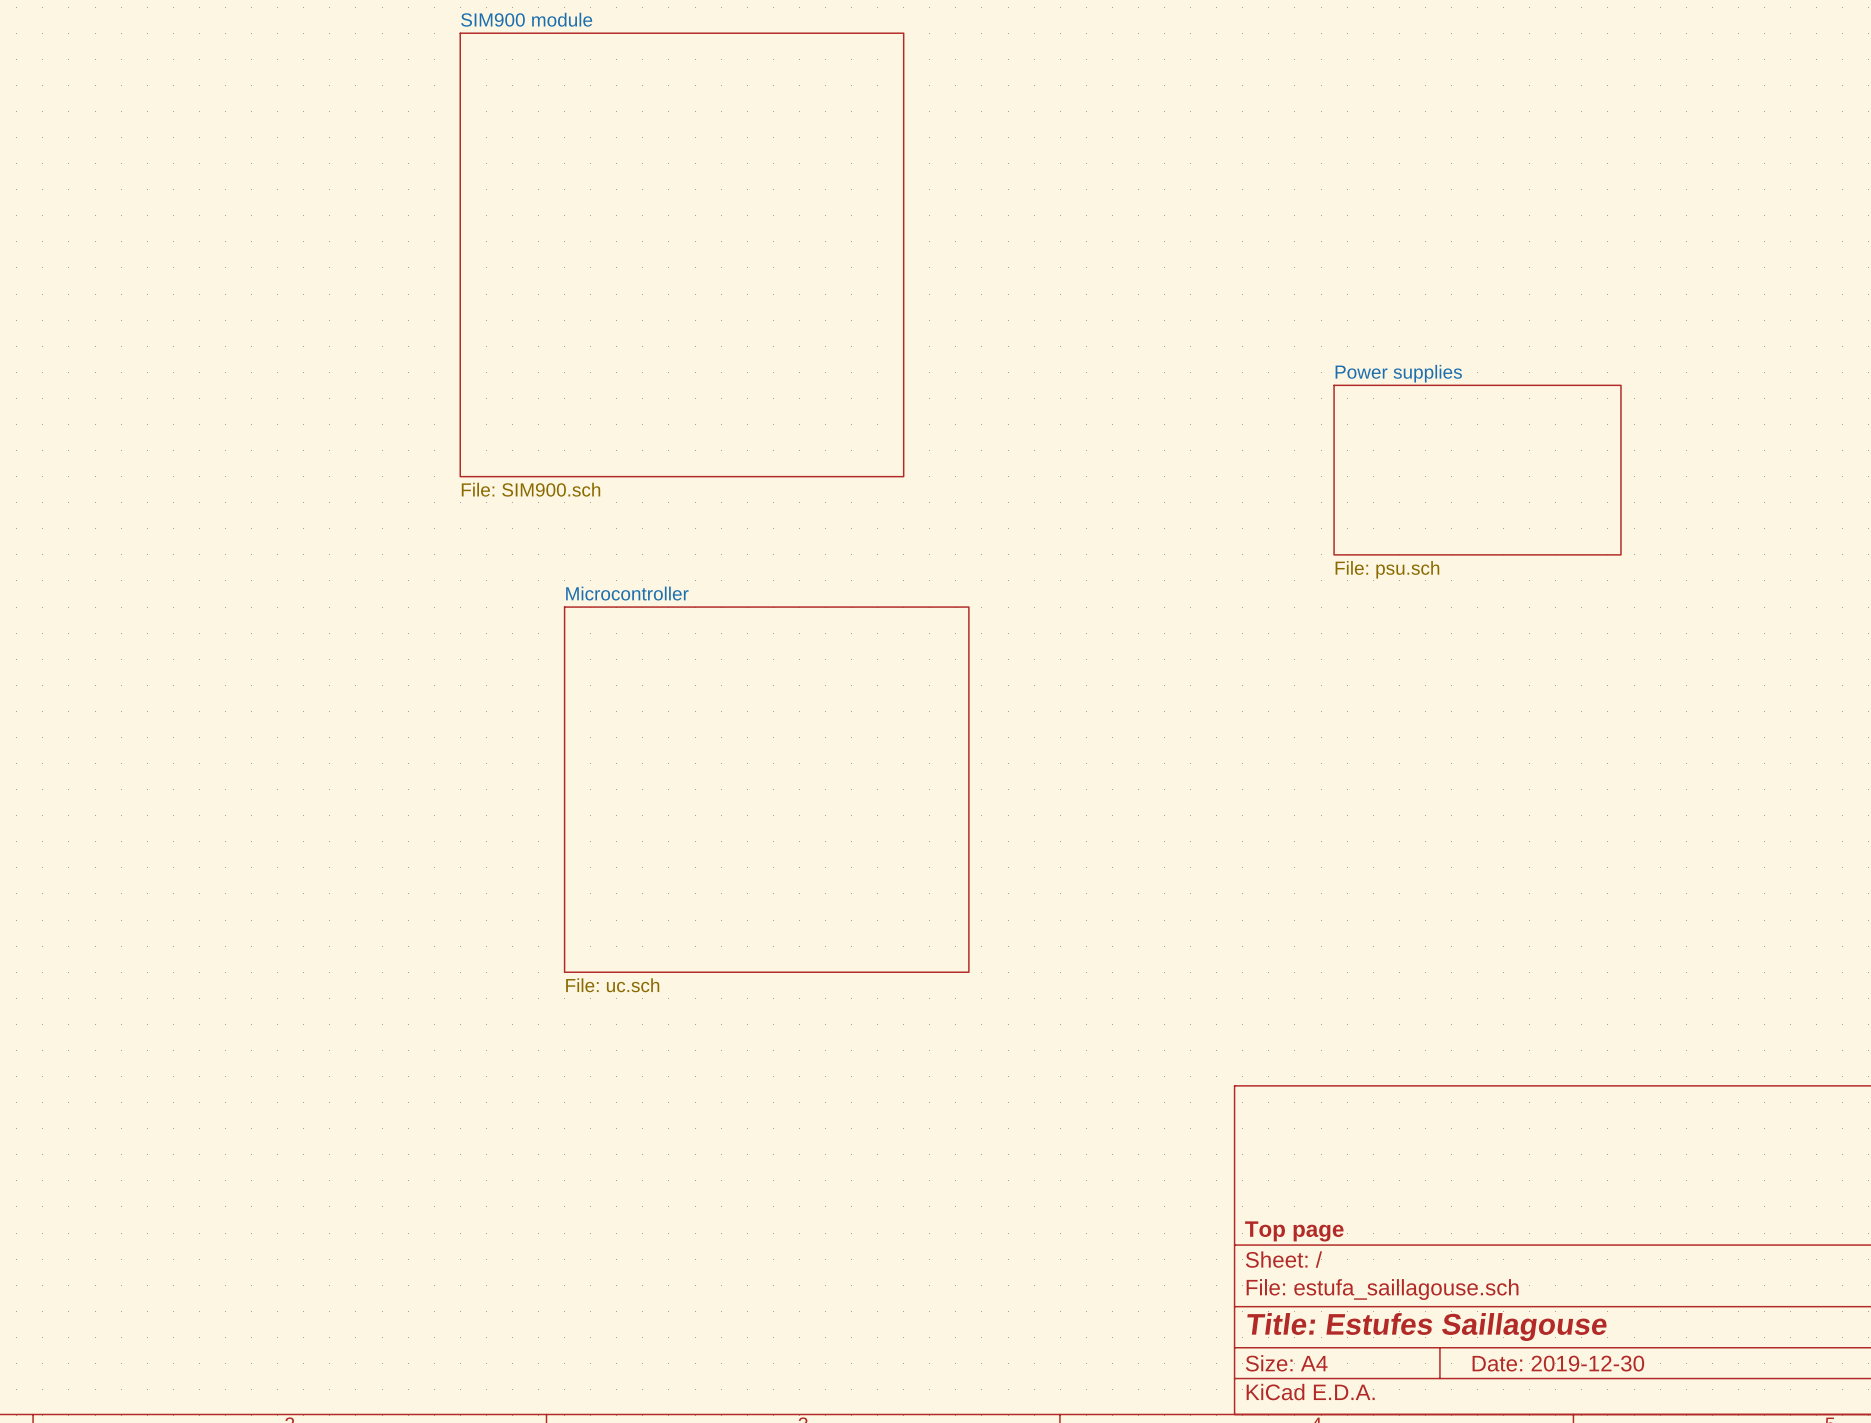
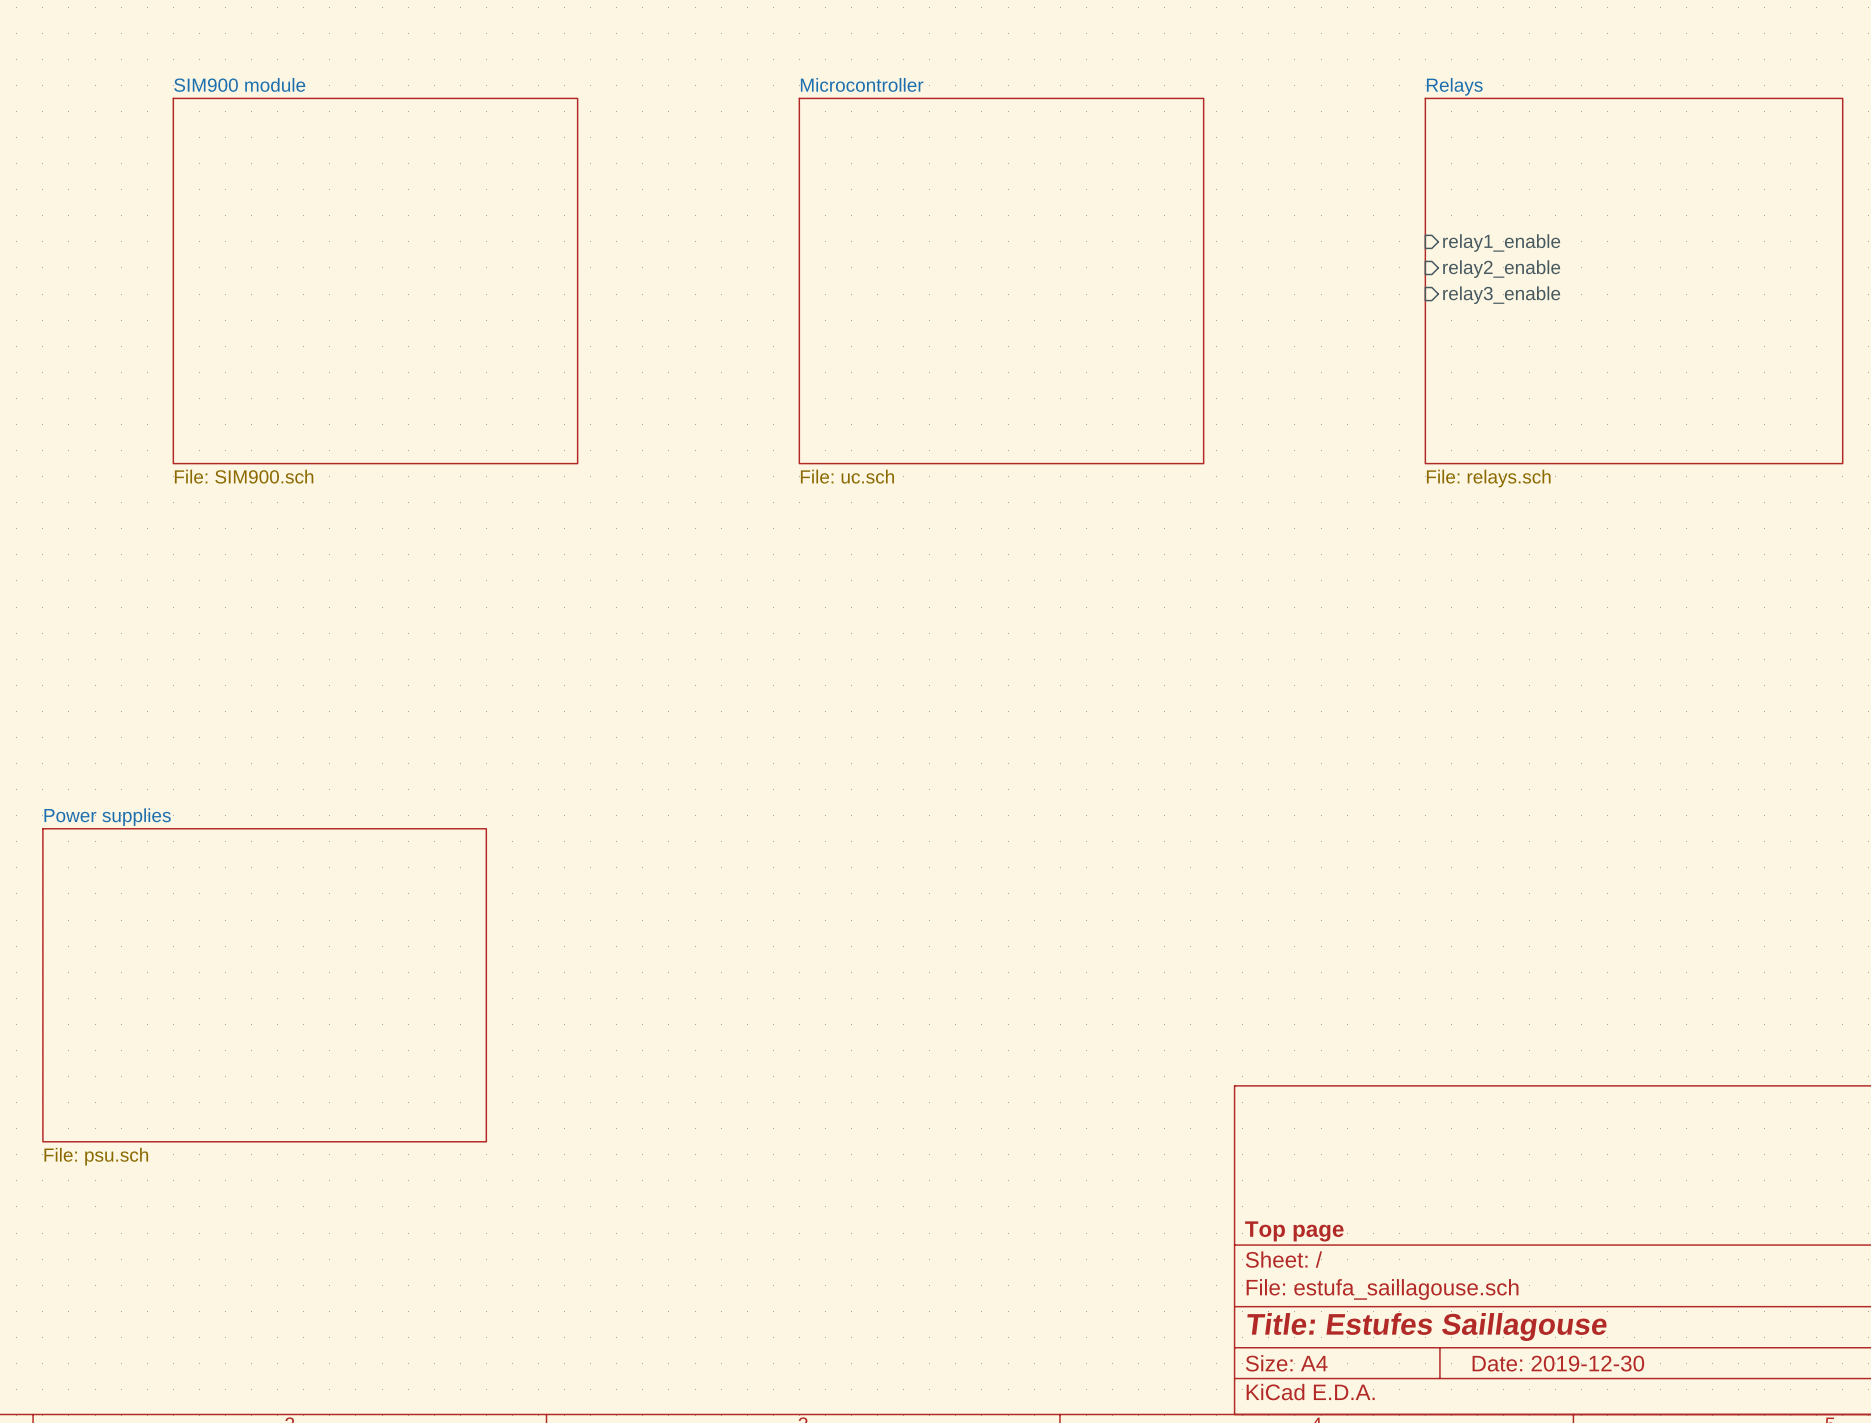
sheet SIM900 module name position: SIM900 module (526, 19) -> SIM900 module (239, 84)
sheet SIM900 module shape: [460, 33, 904, 477] -> [173, 98, 578, 464]
sheet pin: none -> relay1_enable (1501, 243)
sheet pin: none -> relay2_enable (1501, 269)
sheet Microcontroller: none -> File: uc.sch (1001, 281)
sheet Relays: none -> File: relays.sch (1634, 281)
sheet pin: none -> relay3_enable (1501, 295)
sheet Power supplies: File: psu.sch (1477, 470) -> none
sheet SIM900 module value position: File: SIM900.sch (531, 489) -> File: SIM900.sch (244, 476)
sheet Microcontroller: File: uc.sch (766, 789) -> none
sheet Power supplies: none -> File: psu.sch (264, 985)

